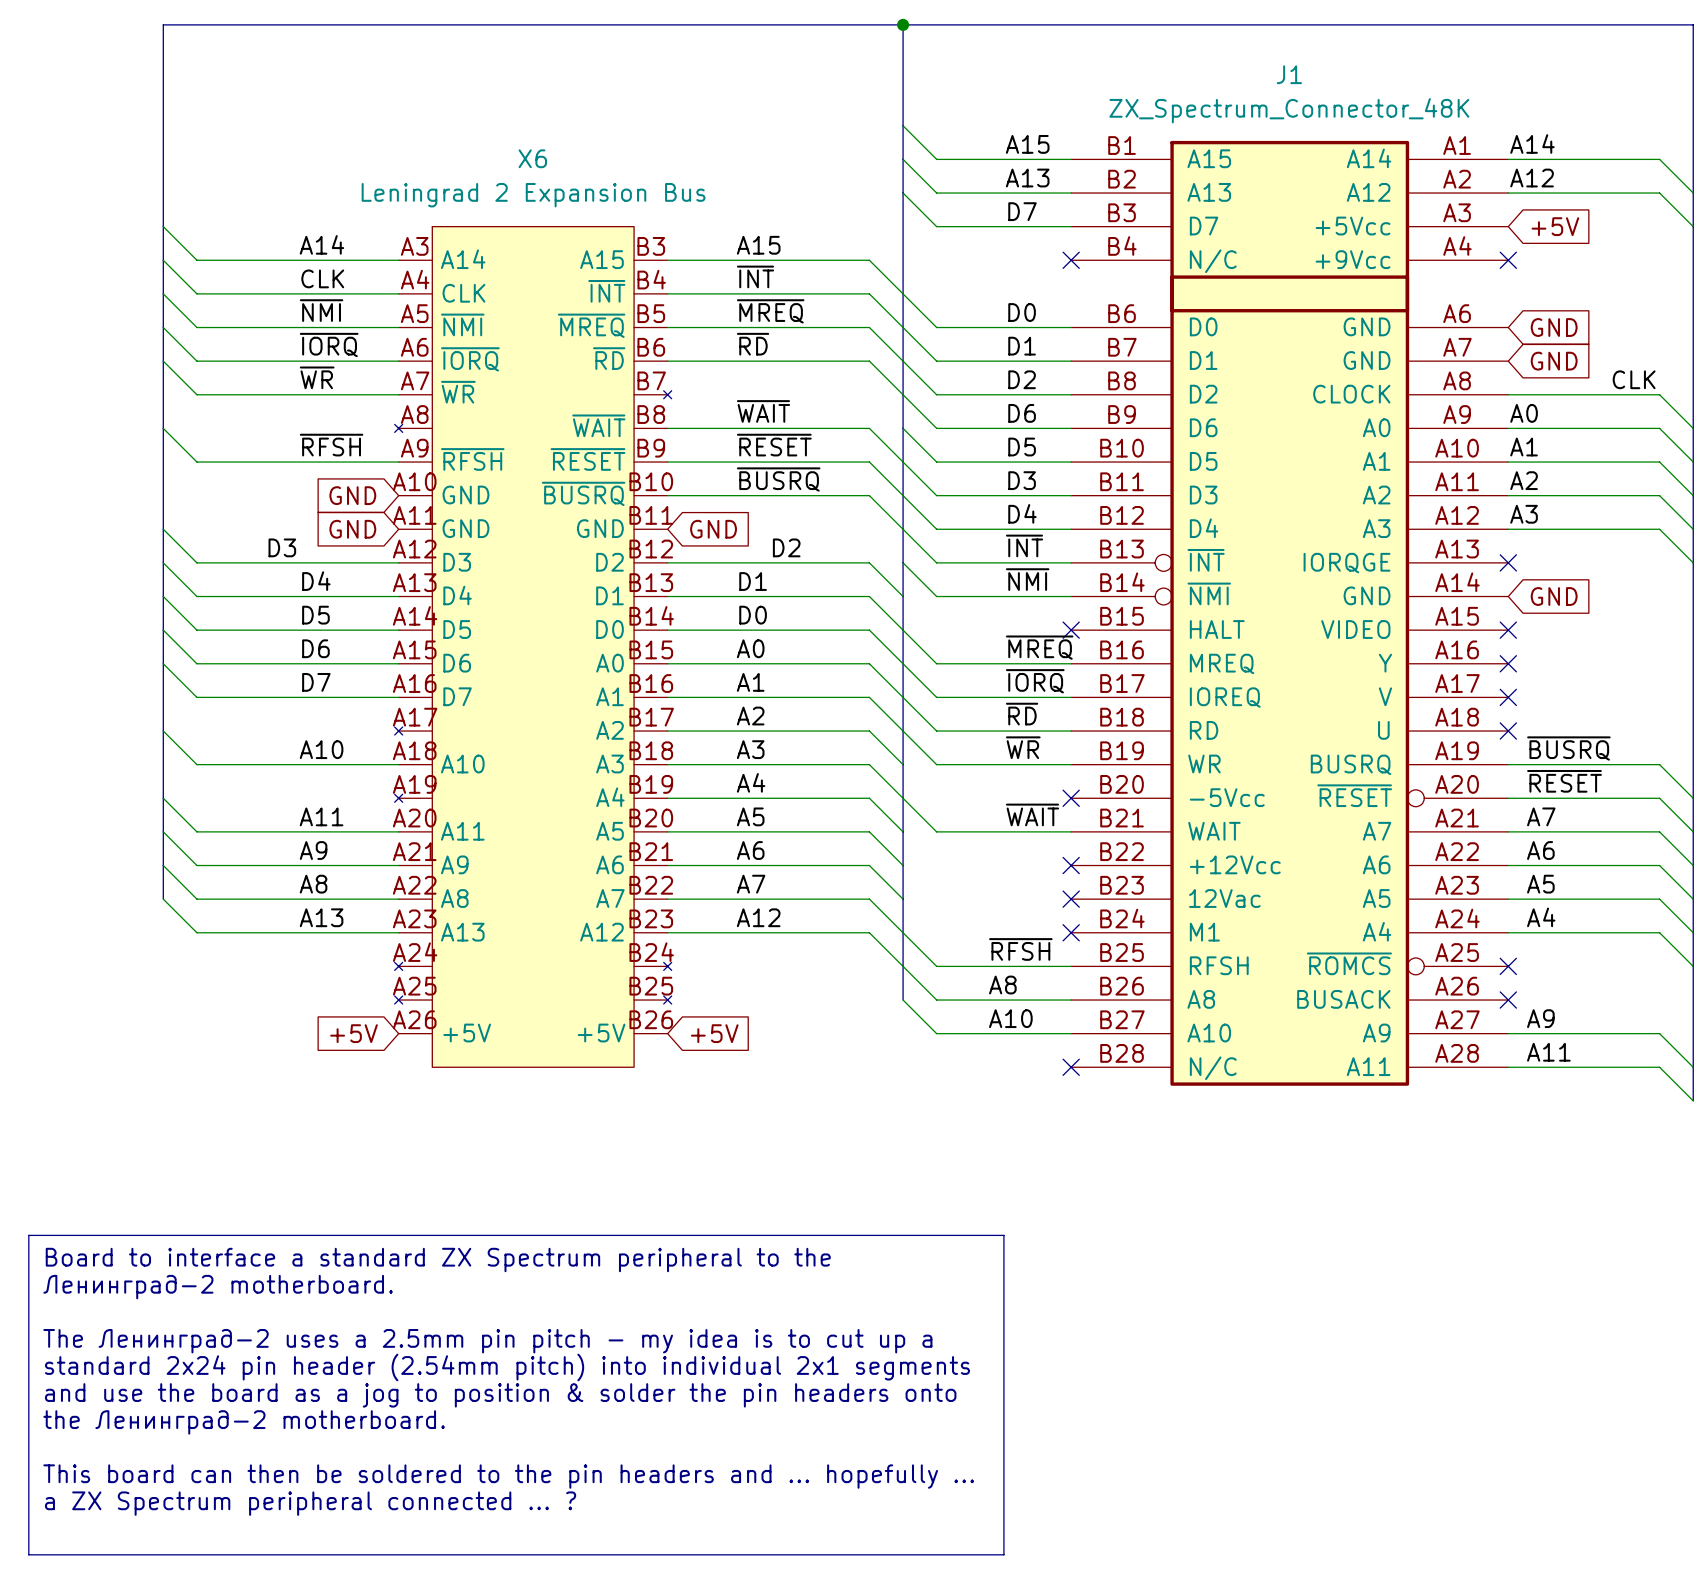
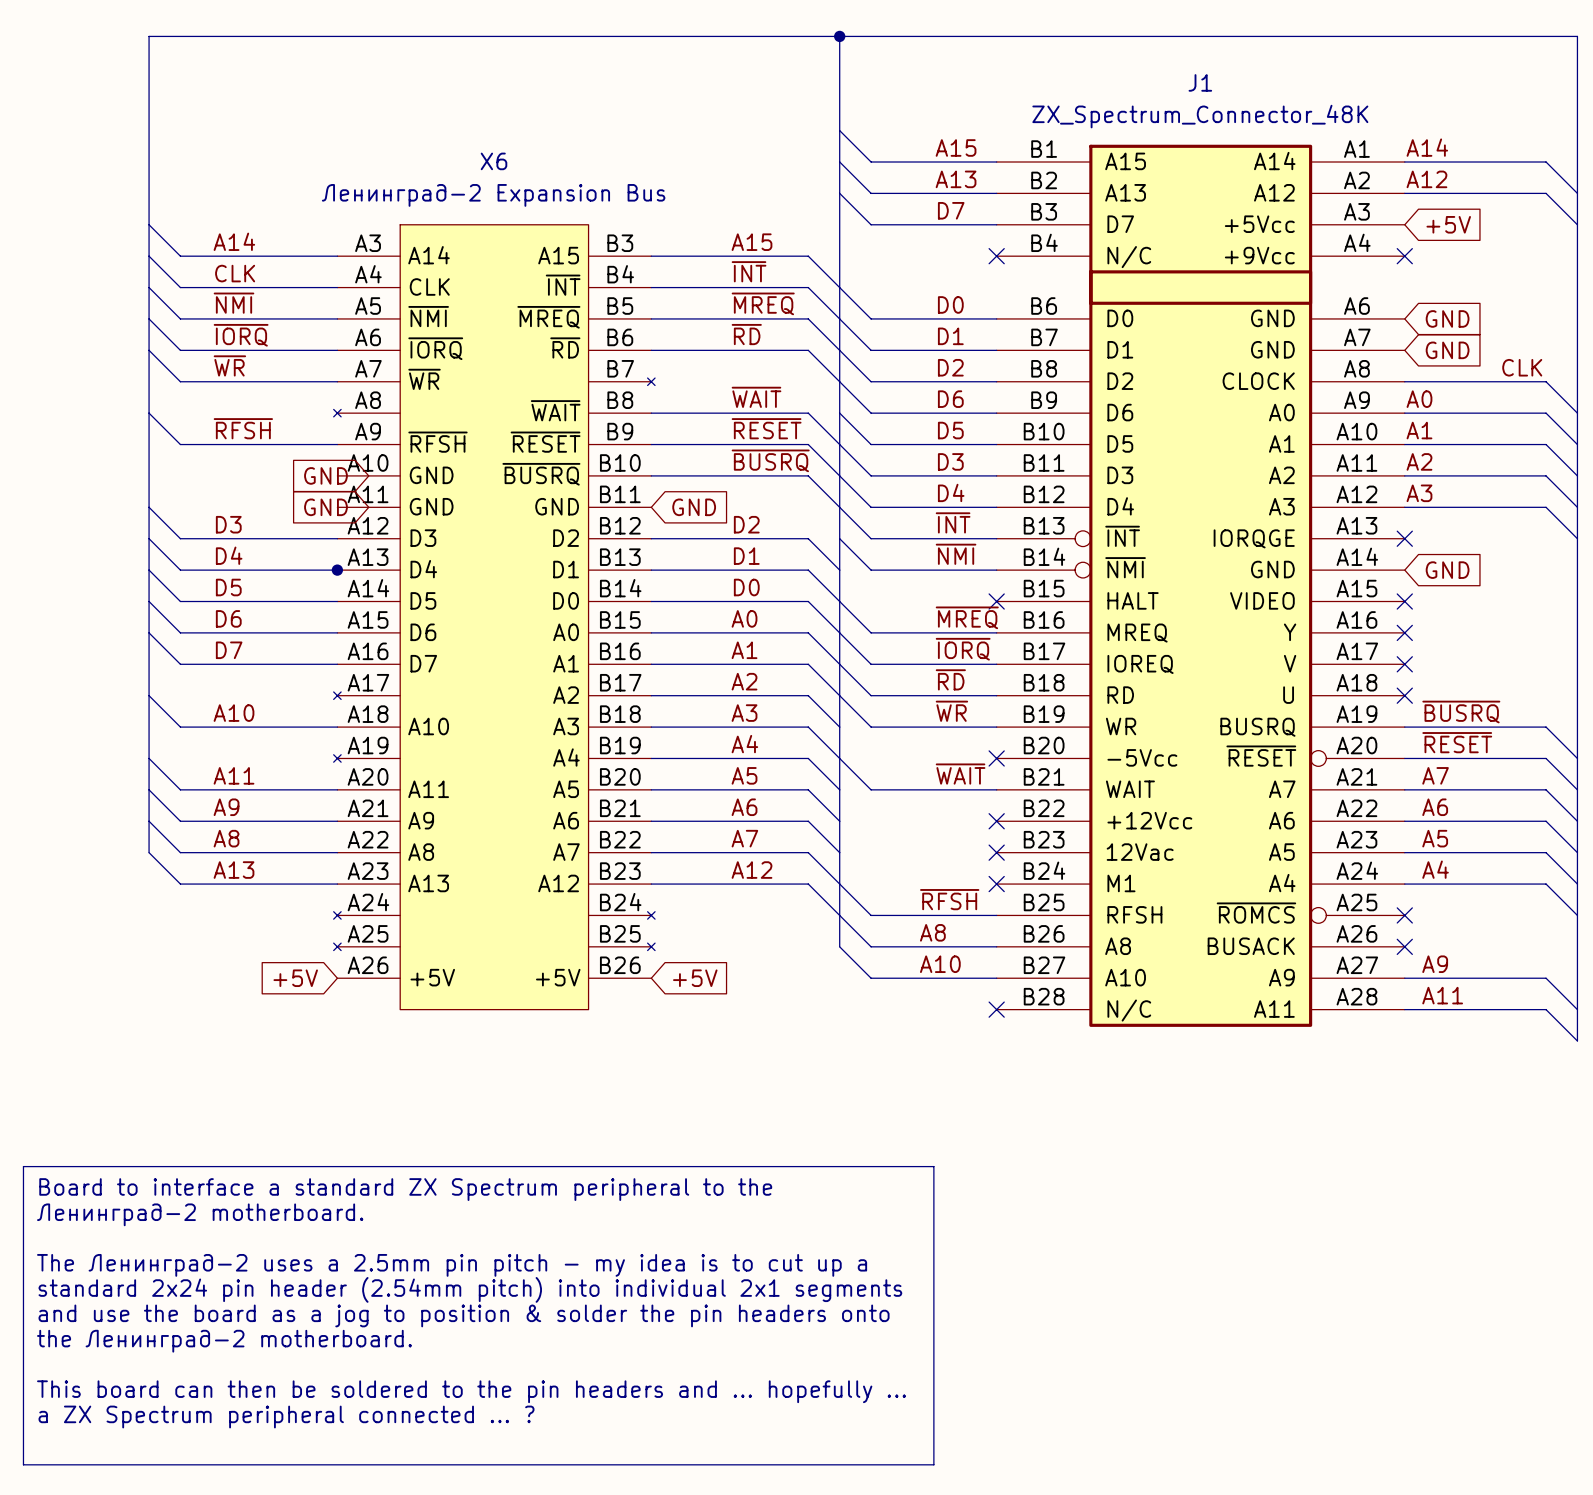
X6 value: Leningrad 2 Expansion Bus (533, 195) -> Ленинград-2 Expansion Bus (493, 195)
X6 symbol: [394, 226, 672, 1068] -> [333, 224, 656, 1010]
label position: A14 (321, 244) -> A14 (234, 241)
label position: A15 (758, 245) -> A15 (751, 242)
label position: ~{INT} (755, 276) -> ~{INT} (749, 271)
label position: CLK (322, 278) -> CLK (235, 273)
label position: ~{NMI} (321, 310) -> ~{NMI} (234, 303)
label position: ~{MREQ} (770, 311) -> ~{MREQ} (763, 303)
label position: ~{RD} (753, 344) -> ~{RD} (746, 334)
label position: ~{IORQ} (329, 345) -> ~{IORQ} (241, 335)
label position: ~{WR} (317, 377) -> ~{WR} (229, 365)
label position: ~{WAIT} (763, 411) -> ~{WAIT} (756, 397)
label position: ~{RFSH} (331, 445) -> ~{RFSH} (243, 428)
label position: ~{RESET} (774, 445) -> ~{RESET} (766, 428)
label position: ~{BUSRQ} (778, 479) -> ~{BUSRQ} (770, 460)
global label position: GND (713, 529) -> GND (694, 507)
label position: D3 (282, 547) -> D3 (228, 524)
label position: D2 (786, 547) -> D2 (746, 524)
label position: D4 (316, 581) -> D4 (229, 555)
label position: D1 (753, 581) -> D1 (746, 556)
junction: none -> (337, 570)
label position: D5 (315, 615) -> D5 (228, 587)
label position: D0 (753, 615) -> D0 (746, 587)
label position: D6 (315, 648) -> D6 (228, 618)
label position: A0 (750, 648) -> A0 (744, 618)
label position: D7 (316, 682) -> D7 (229, 650)
label position: A1 (750, 682) -> A1 (744, 650)
label position: A2 (750, 716) -> A2 (744, 681)
label position: A10 (321, 749) -> A10 (234, 713)
label position: A3 (750, 749) -> A3 (744, 713)
label position: A4 (751, 782) -> A4 (744, 744)
label position: A11 (321, 816) -> A11 (234, 775)
label position: A5 (750, 816) -> A5 (744, 775)
label position: A9 (313, 850) -> A9 (226, 807)
label position: A6 (750, 850) -> A6 (744, 807)
label position: A8 (313, 884) -> A8 (226, 838)
label position: A7 (751, 884) -> A7 (744, 838)
label position: A13 (321, 917) -> A13 (234, 870)
label position: A12 (758, 917) -> A12 (751, 870)
global label position: +5V (354, 1033) -> +5V (295, 978)
global label position: +5V (714, 1033) -> +5V (695, 978)

